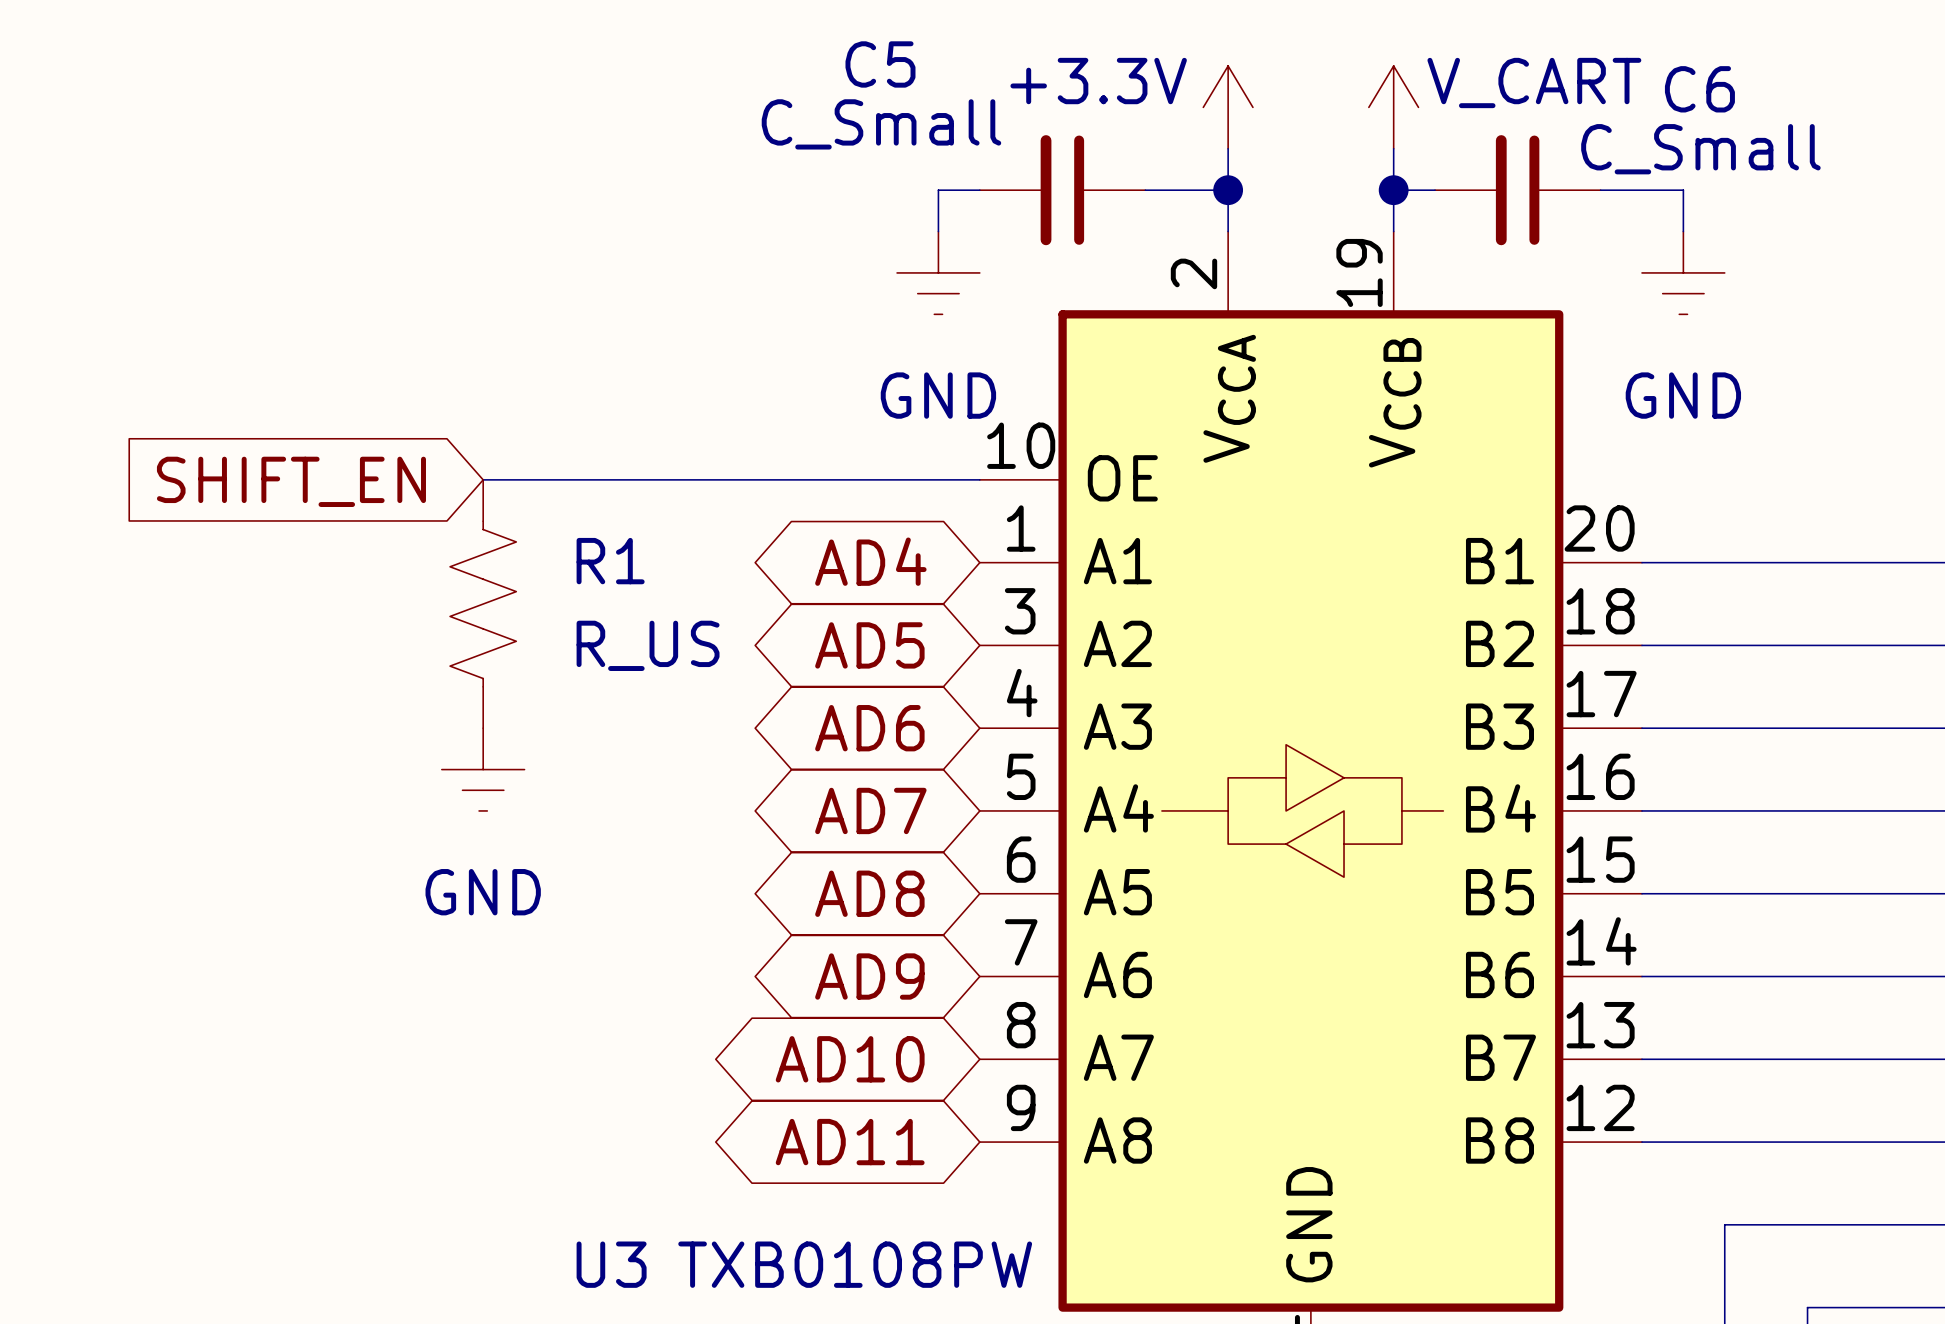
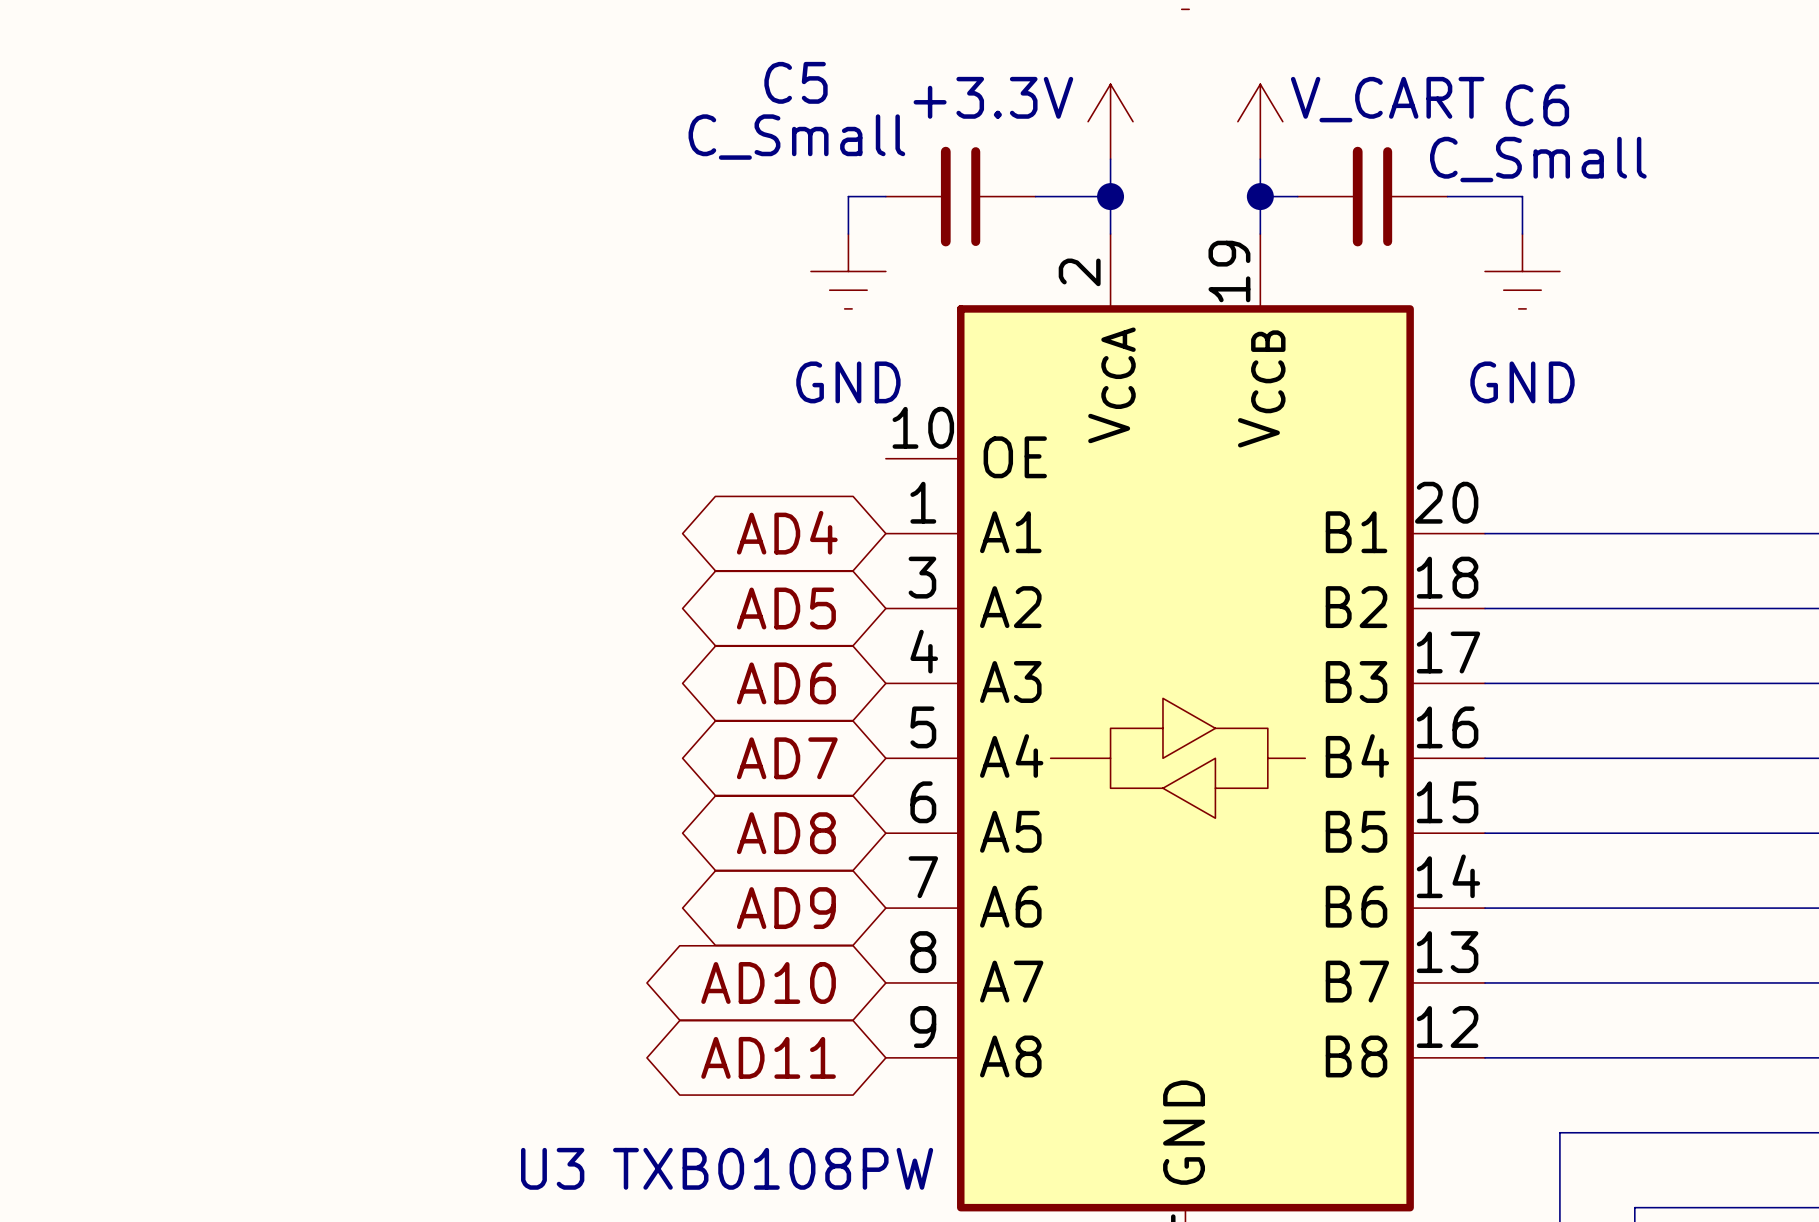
wire: (483, 479) (979, 479) -> none
global label: SHIFT_EN (291, 481) -> none
R1: R_US (483, 604) -> none
power symbol: GND (483, 769) -> none

